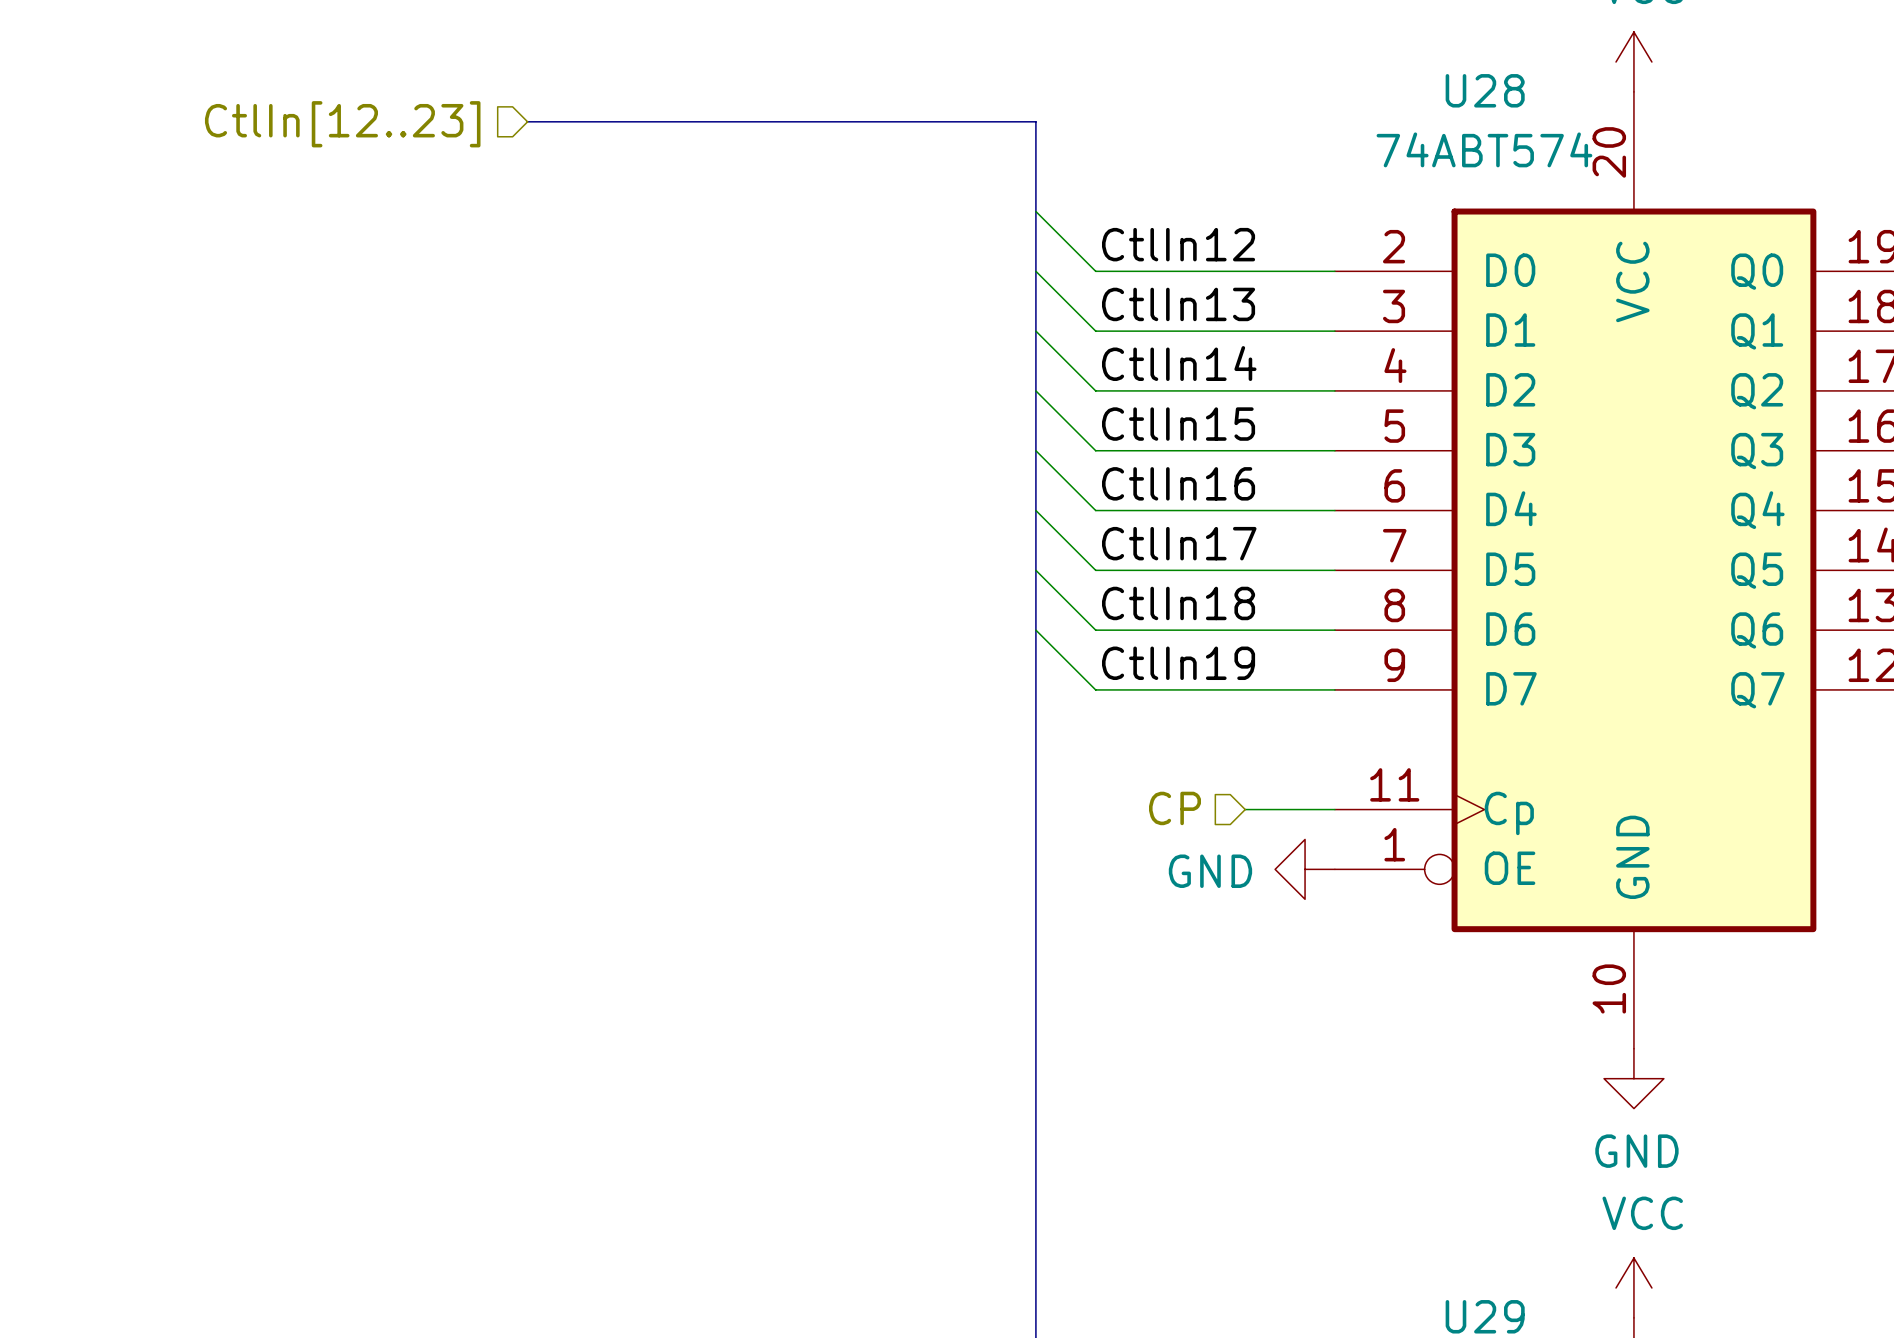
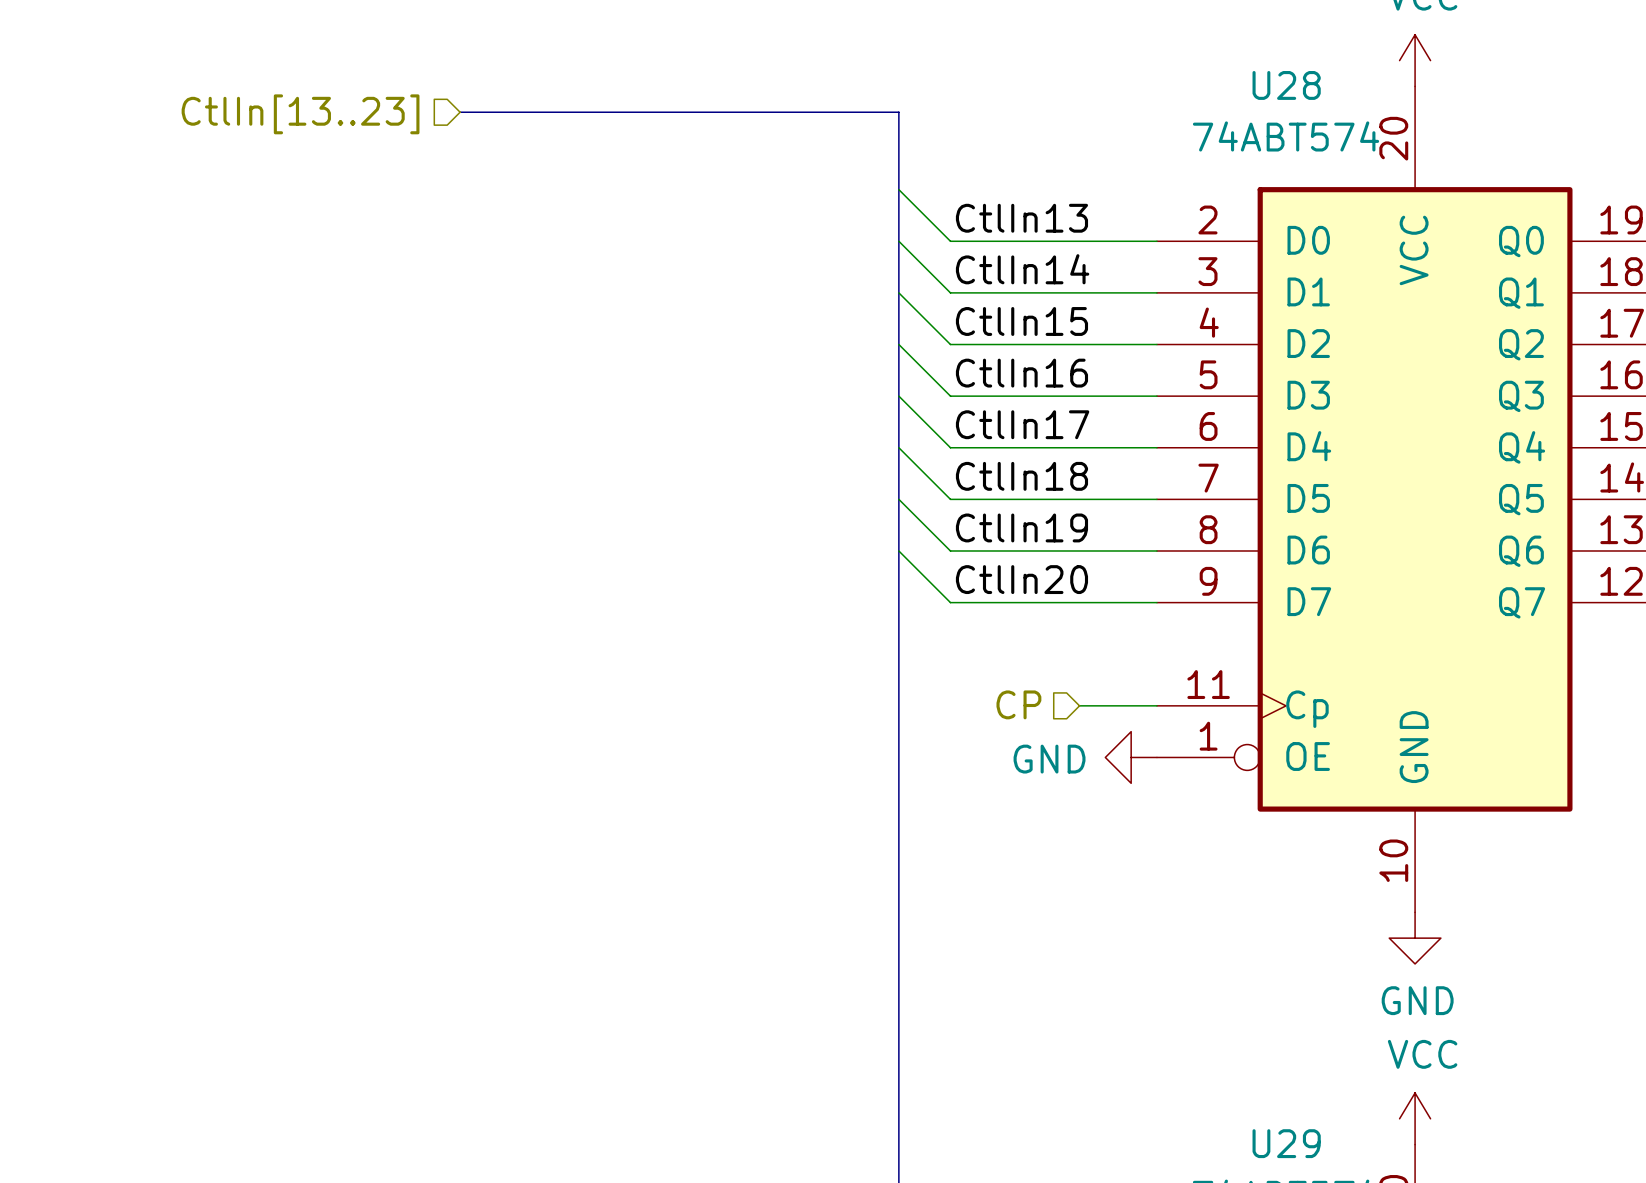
hierarchical label: CtlIn[12..23] (342, 124) -> CtlIn[13..23] (300, 114)
label: CtlIn12 (1178, 244) -> CtlIn13 (1021, 218)
label: CtlIn13 (1178, 304) -> CtlIn14 (1022, 269)
label: CtlIn14 (1179, 363) -> CtlIn15 (1021, 321)
label: CtlIn15 (1178, 424) -> CtlIn16 (1021, 373)
label: CtlIn16 (1178, 483) -> CtlIn17 (1022, 424)
label: CtlIn17 (1179, 543) -> CtlIn18 (1021, 476)
label: CtlIn18 (1178, 603) -> CtlIn19 (1021, 527)
label: CtlIn19 (1178, 663) -> CtlIn20 (1021, 579)

